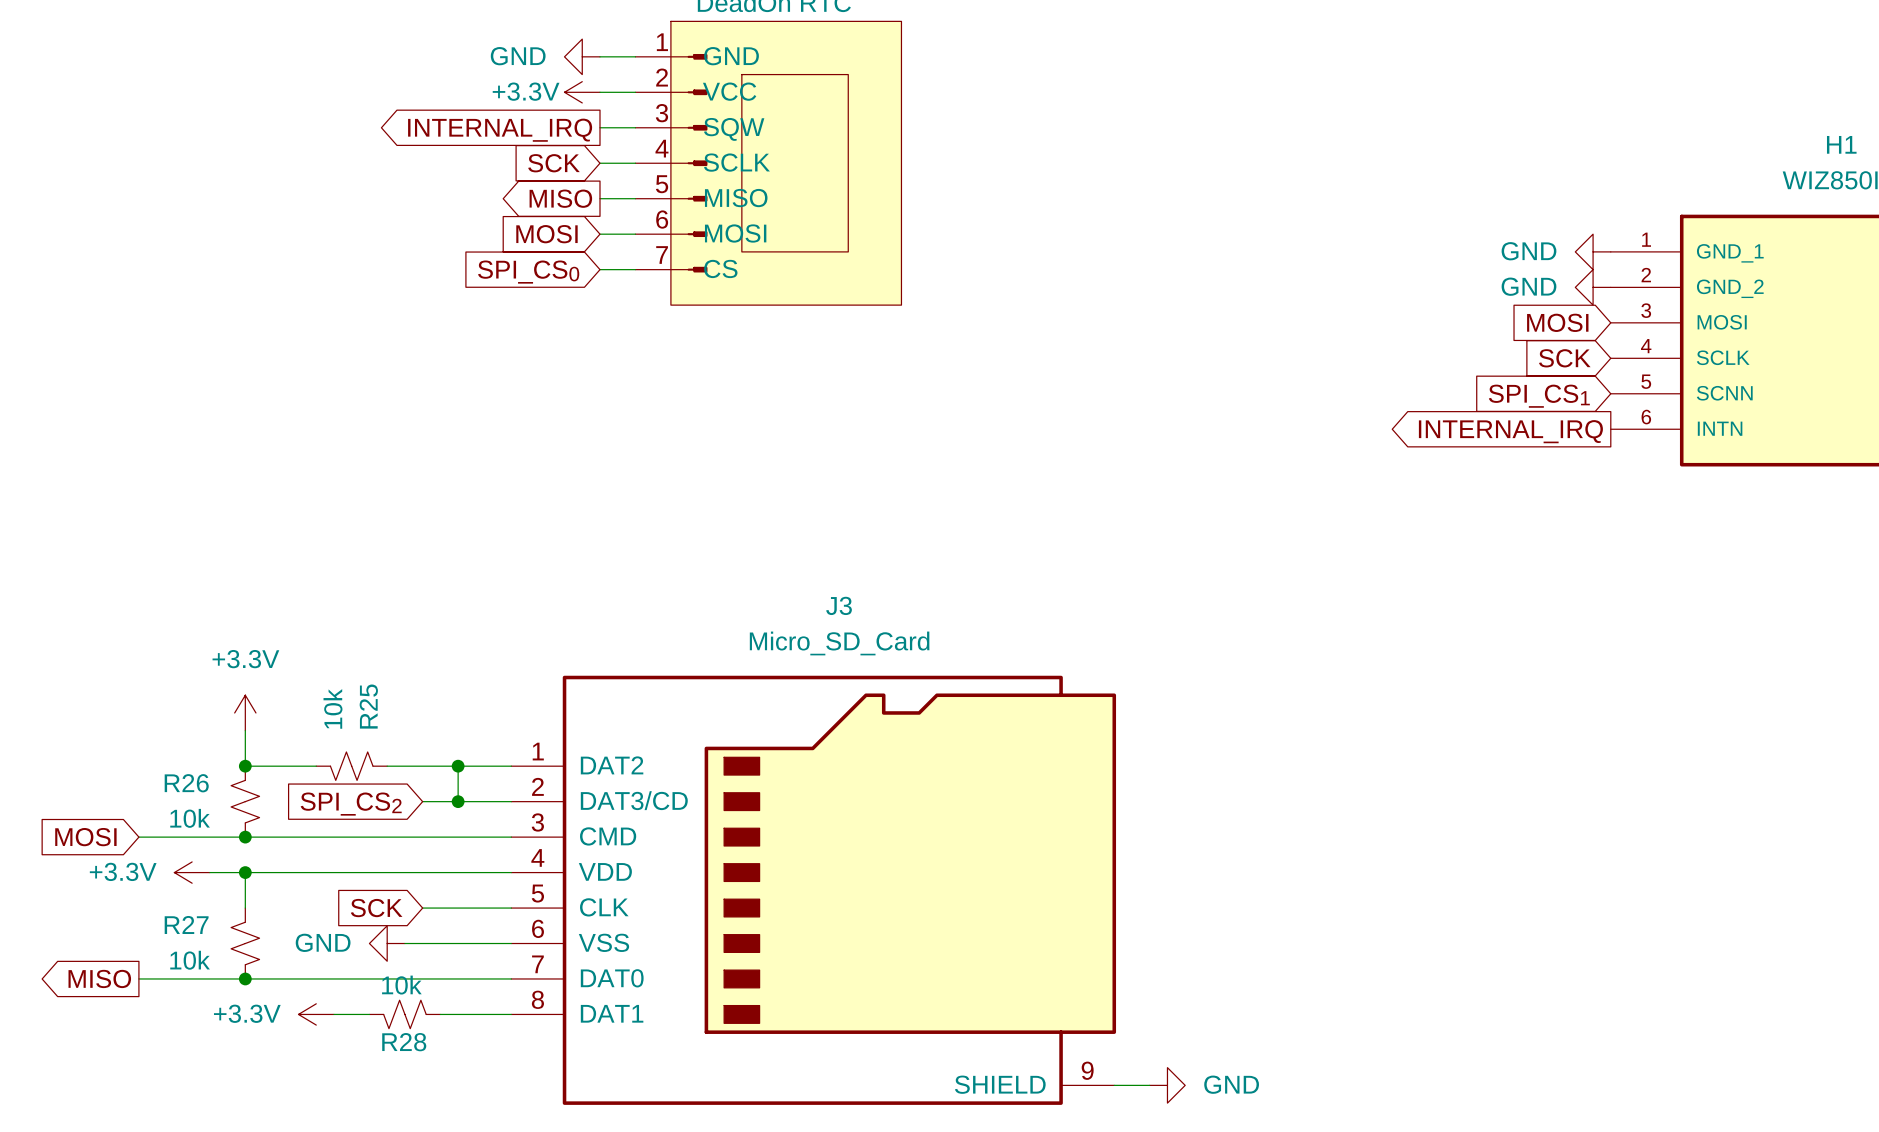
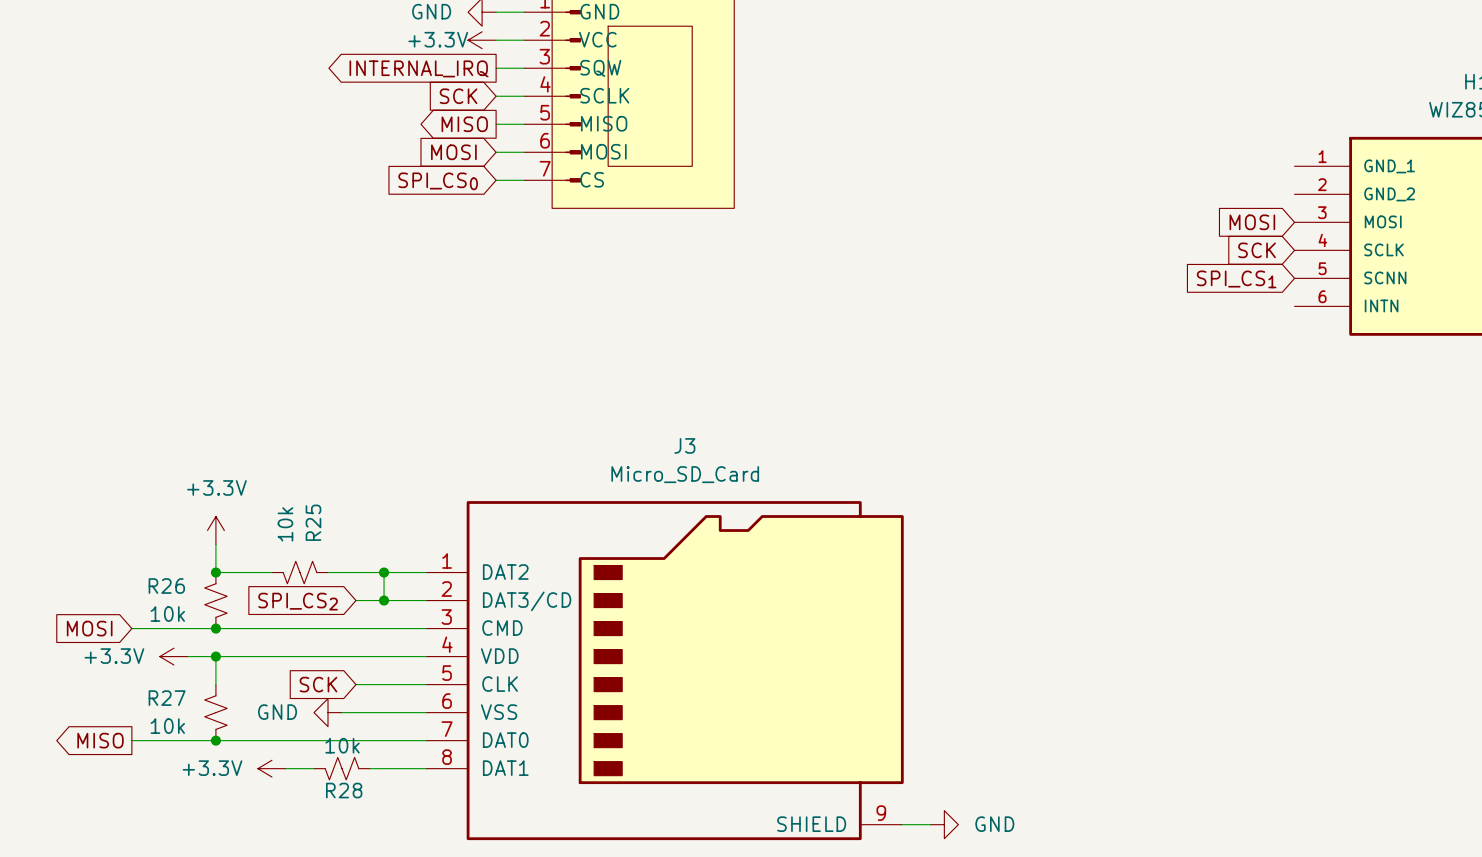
power symbol: GND (1593, 251) -> none
power symbol: GND (1593, 287) -> none
global label: INTERNAL_IRQ (1510, 431) -> none

